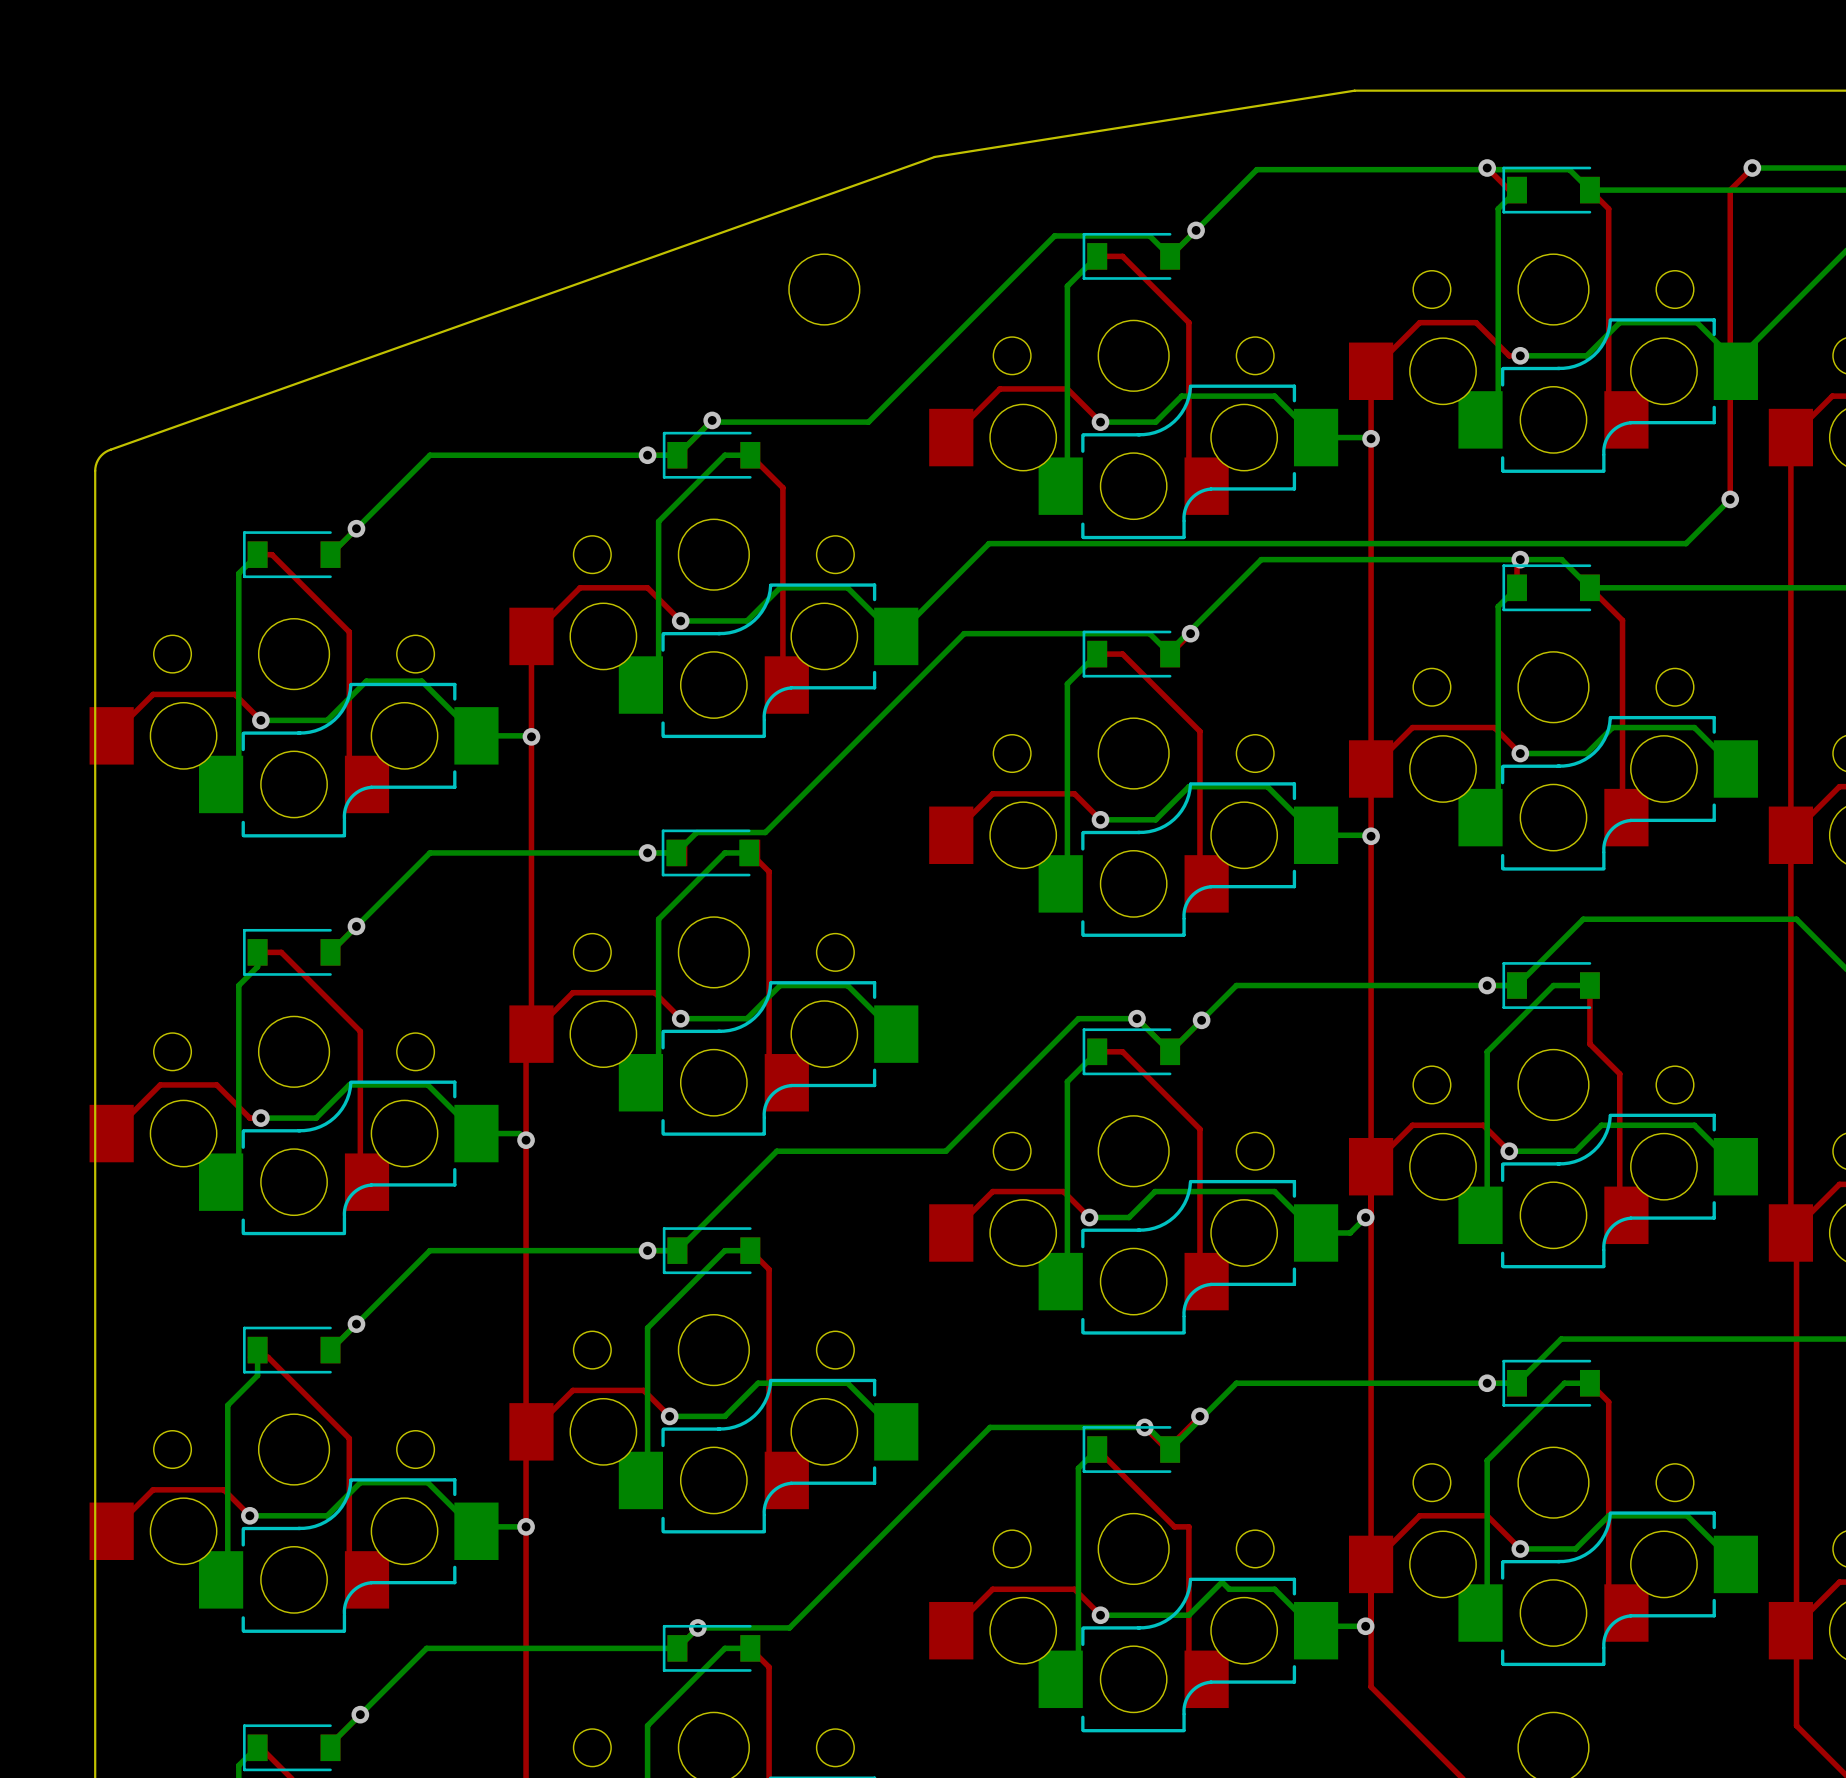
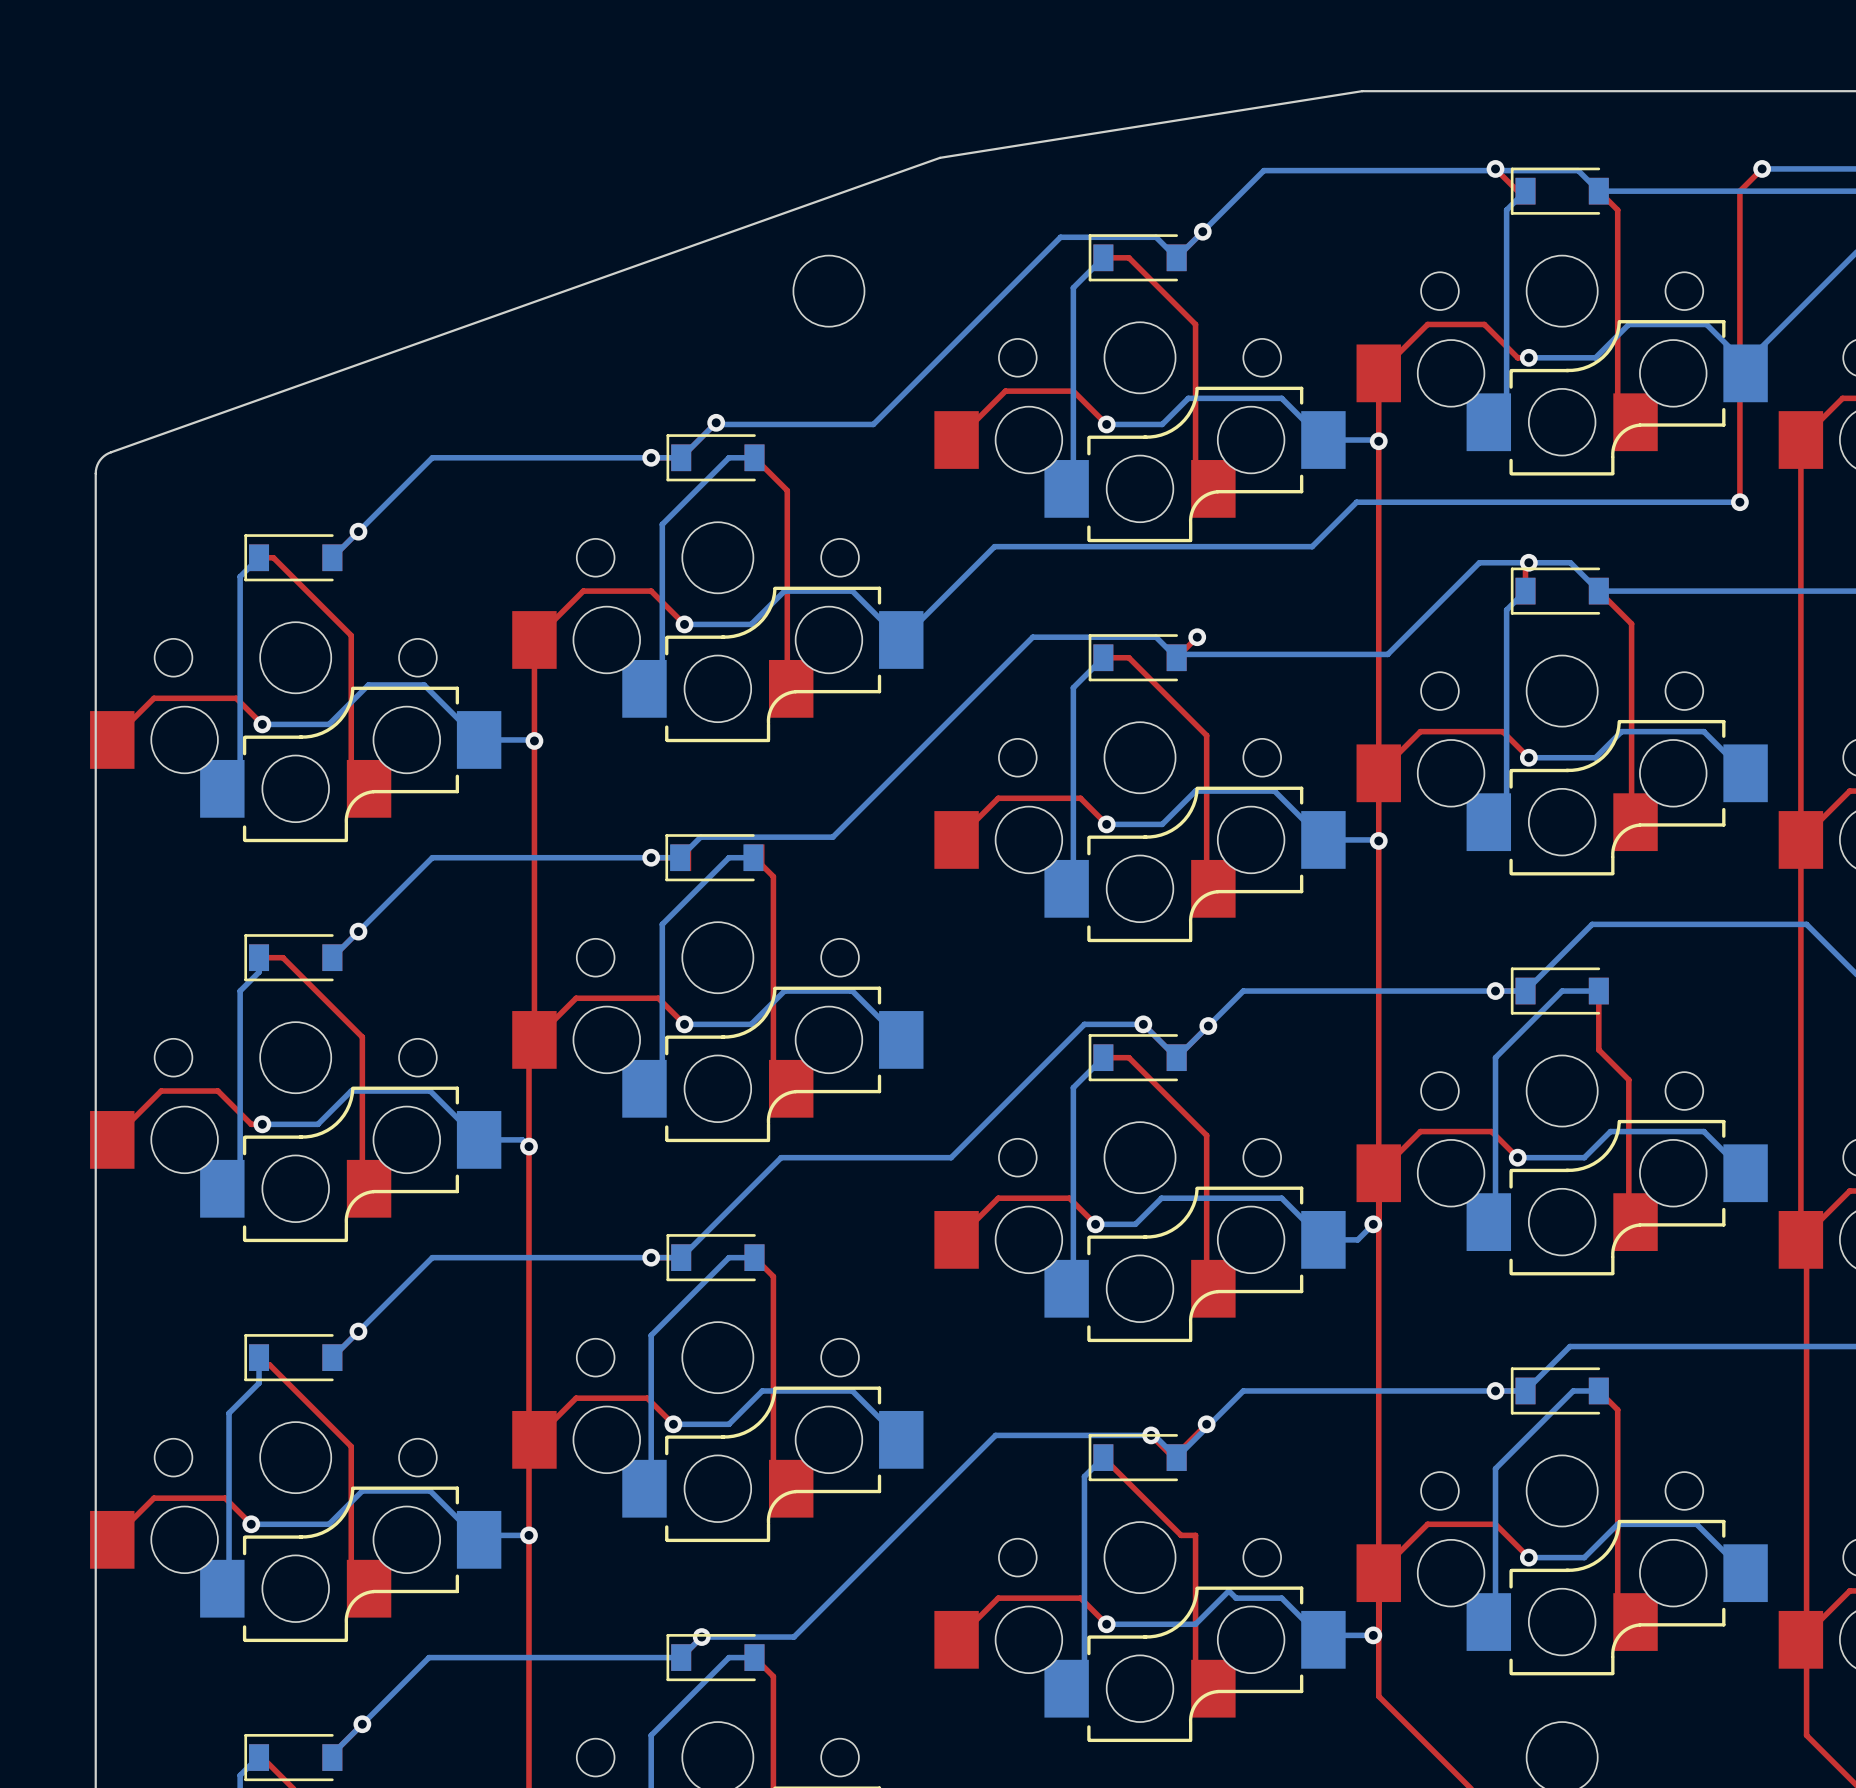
bottom track: (1730, 499) (1686, 543) (1304, 543) -> (1739, 502) (1356, 502) (1312, 546)
bottom track: (1471, 559) (1261, 559) (1170, 650) -> (1479, 562) (1387, 654) (1176, 654)
bottom track: (1027, 633) (964, 633) (765, 832) -> (1032, 637) (832, 837) (769, 837)

